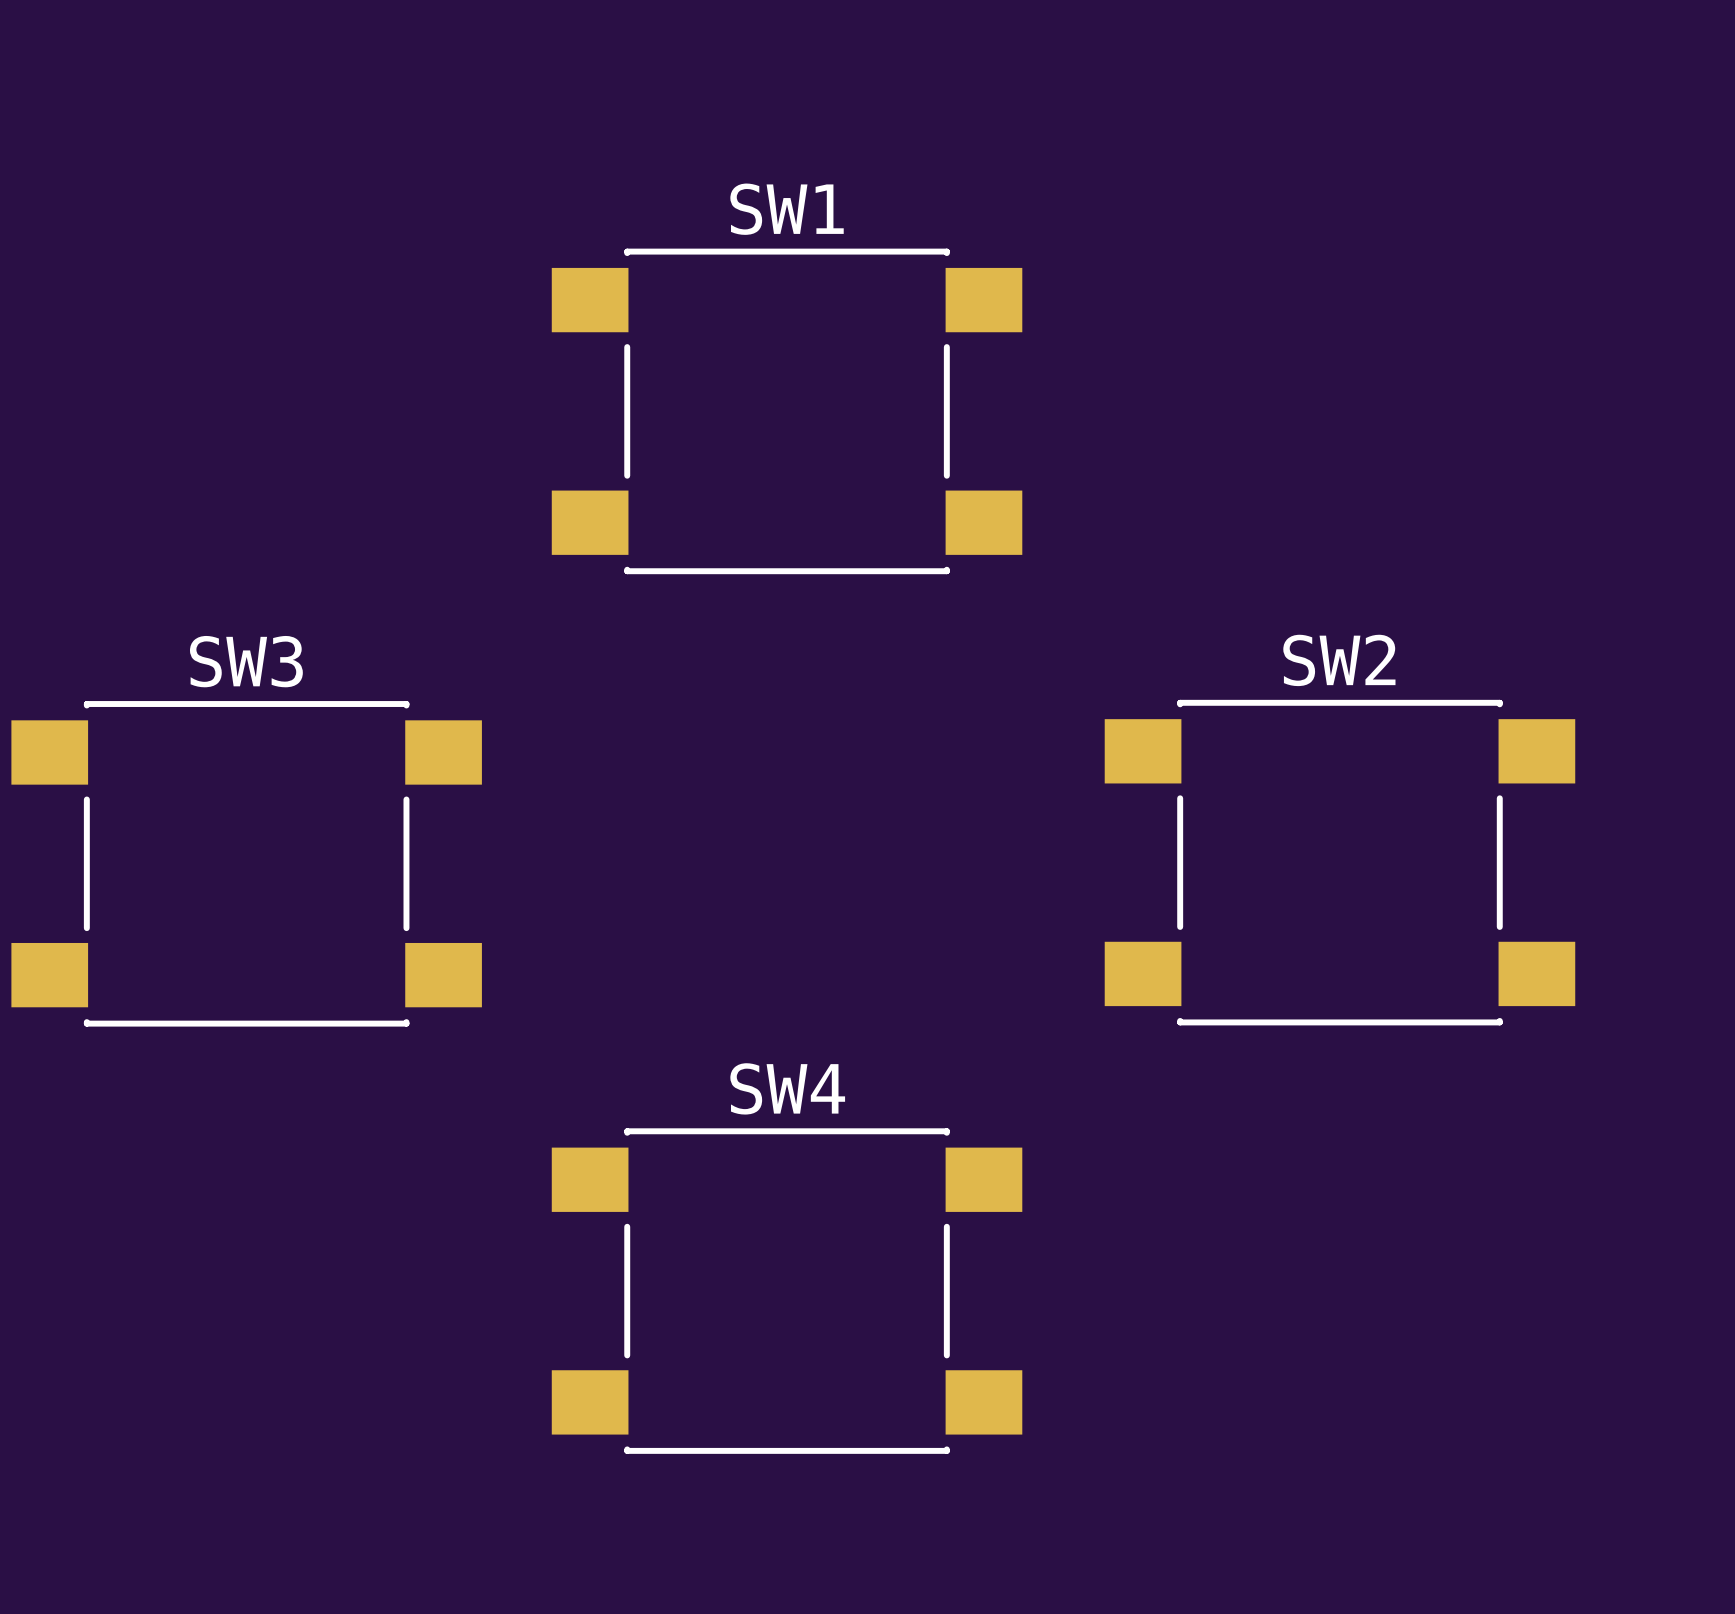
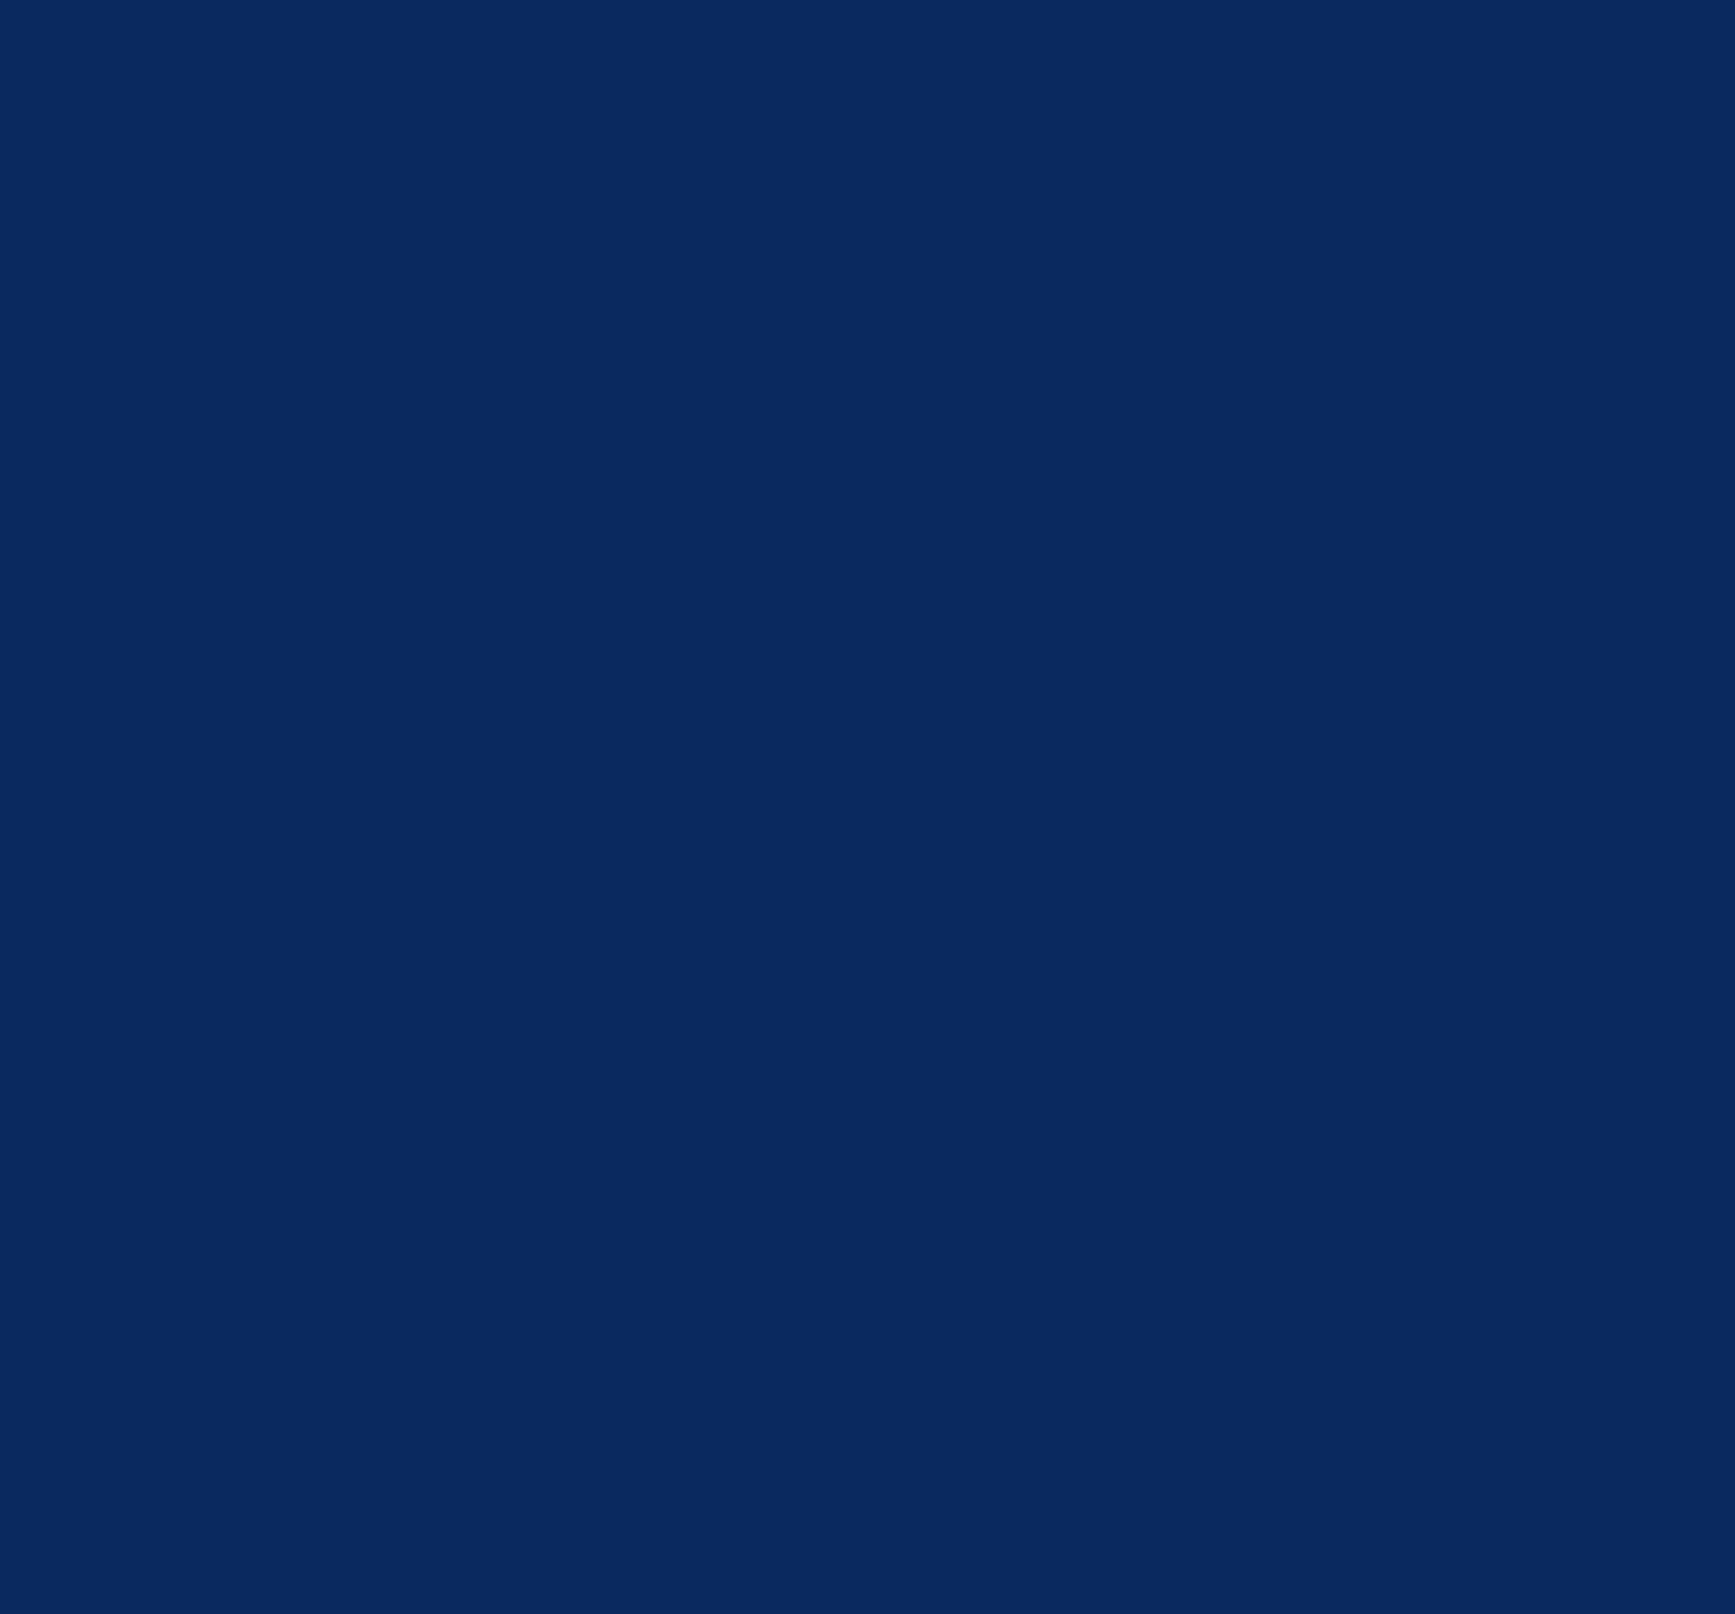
SW1: (787, 411) -> none
SW2: (1339, 862) -> none
SW3: (246, 863) -> none
SW4: (787, 1291) -> none

